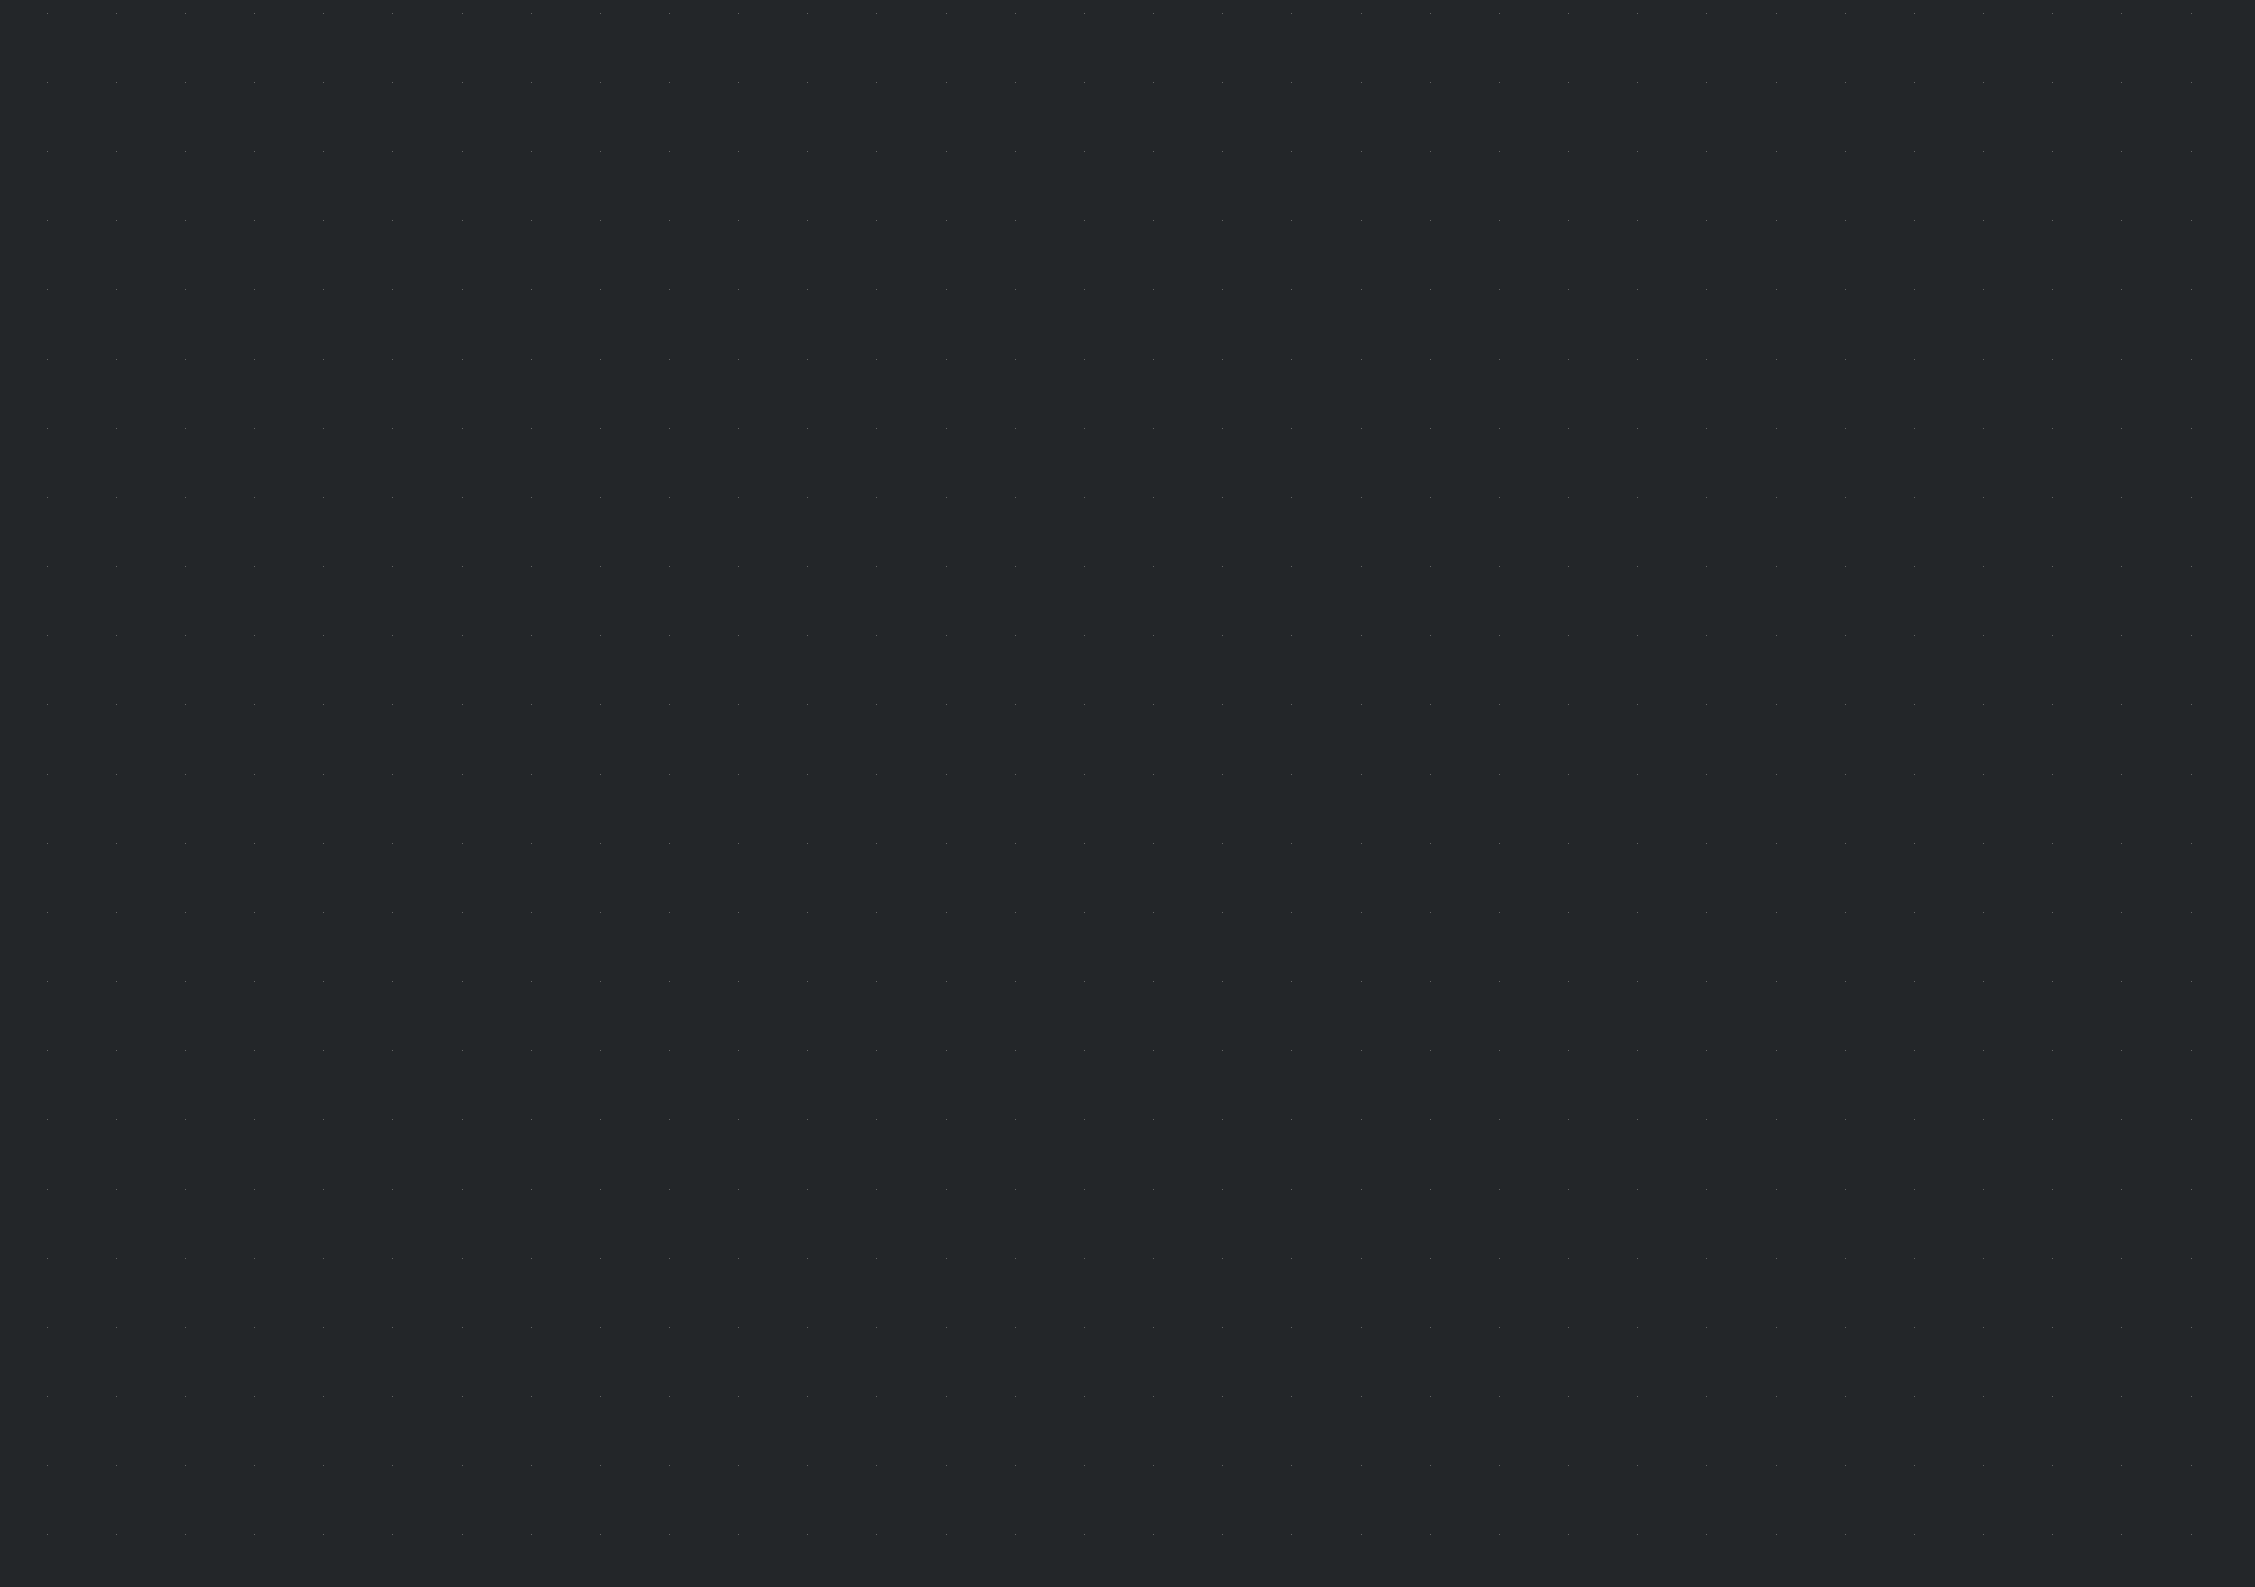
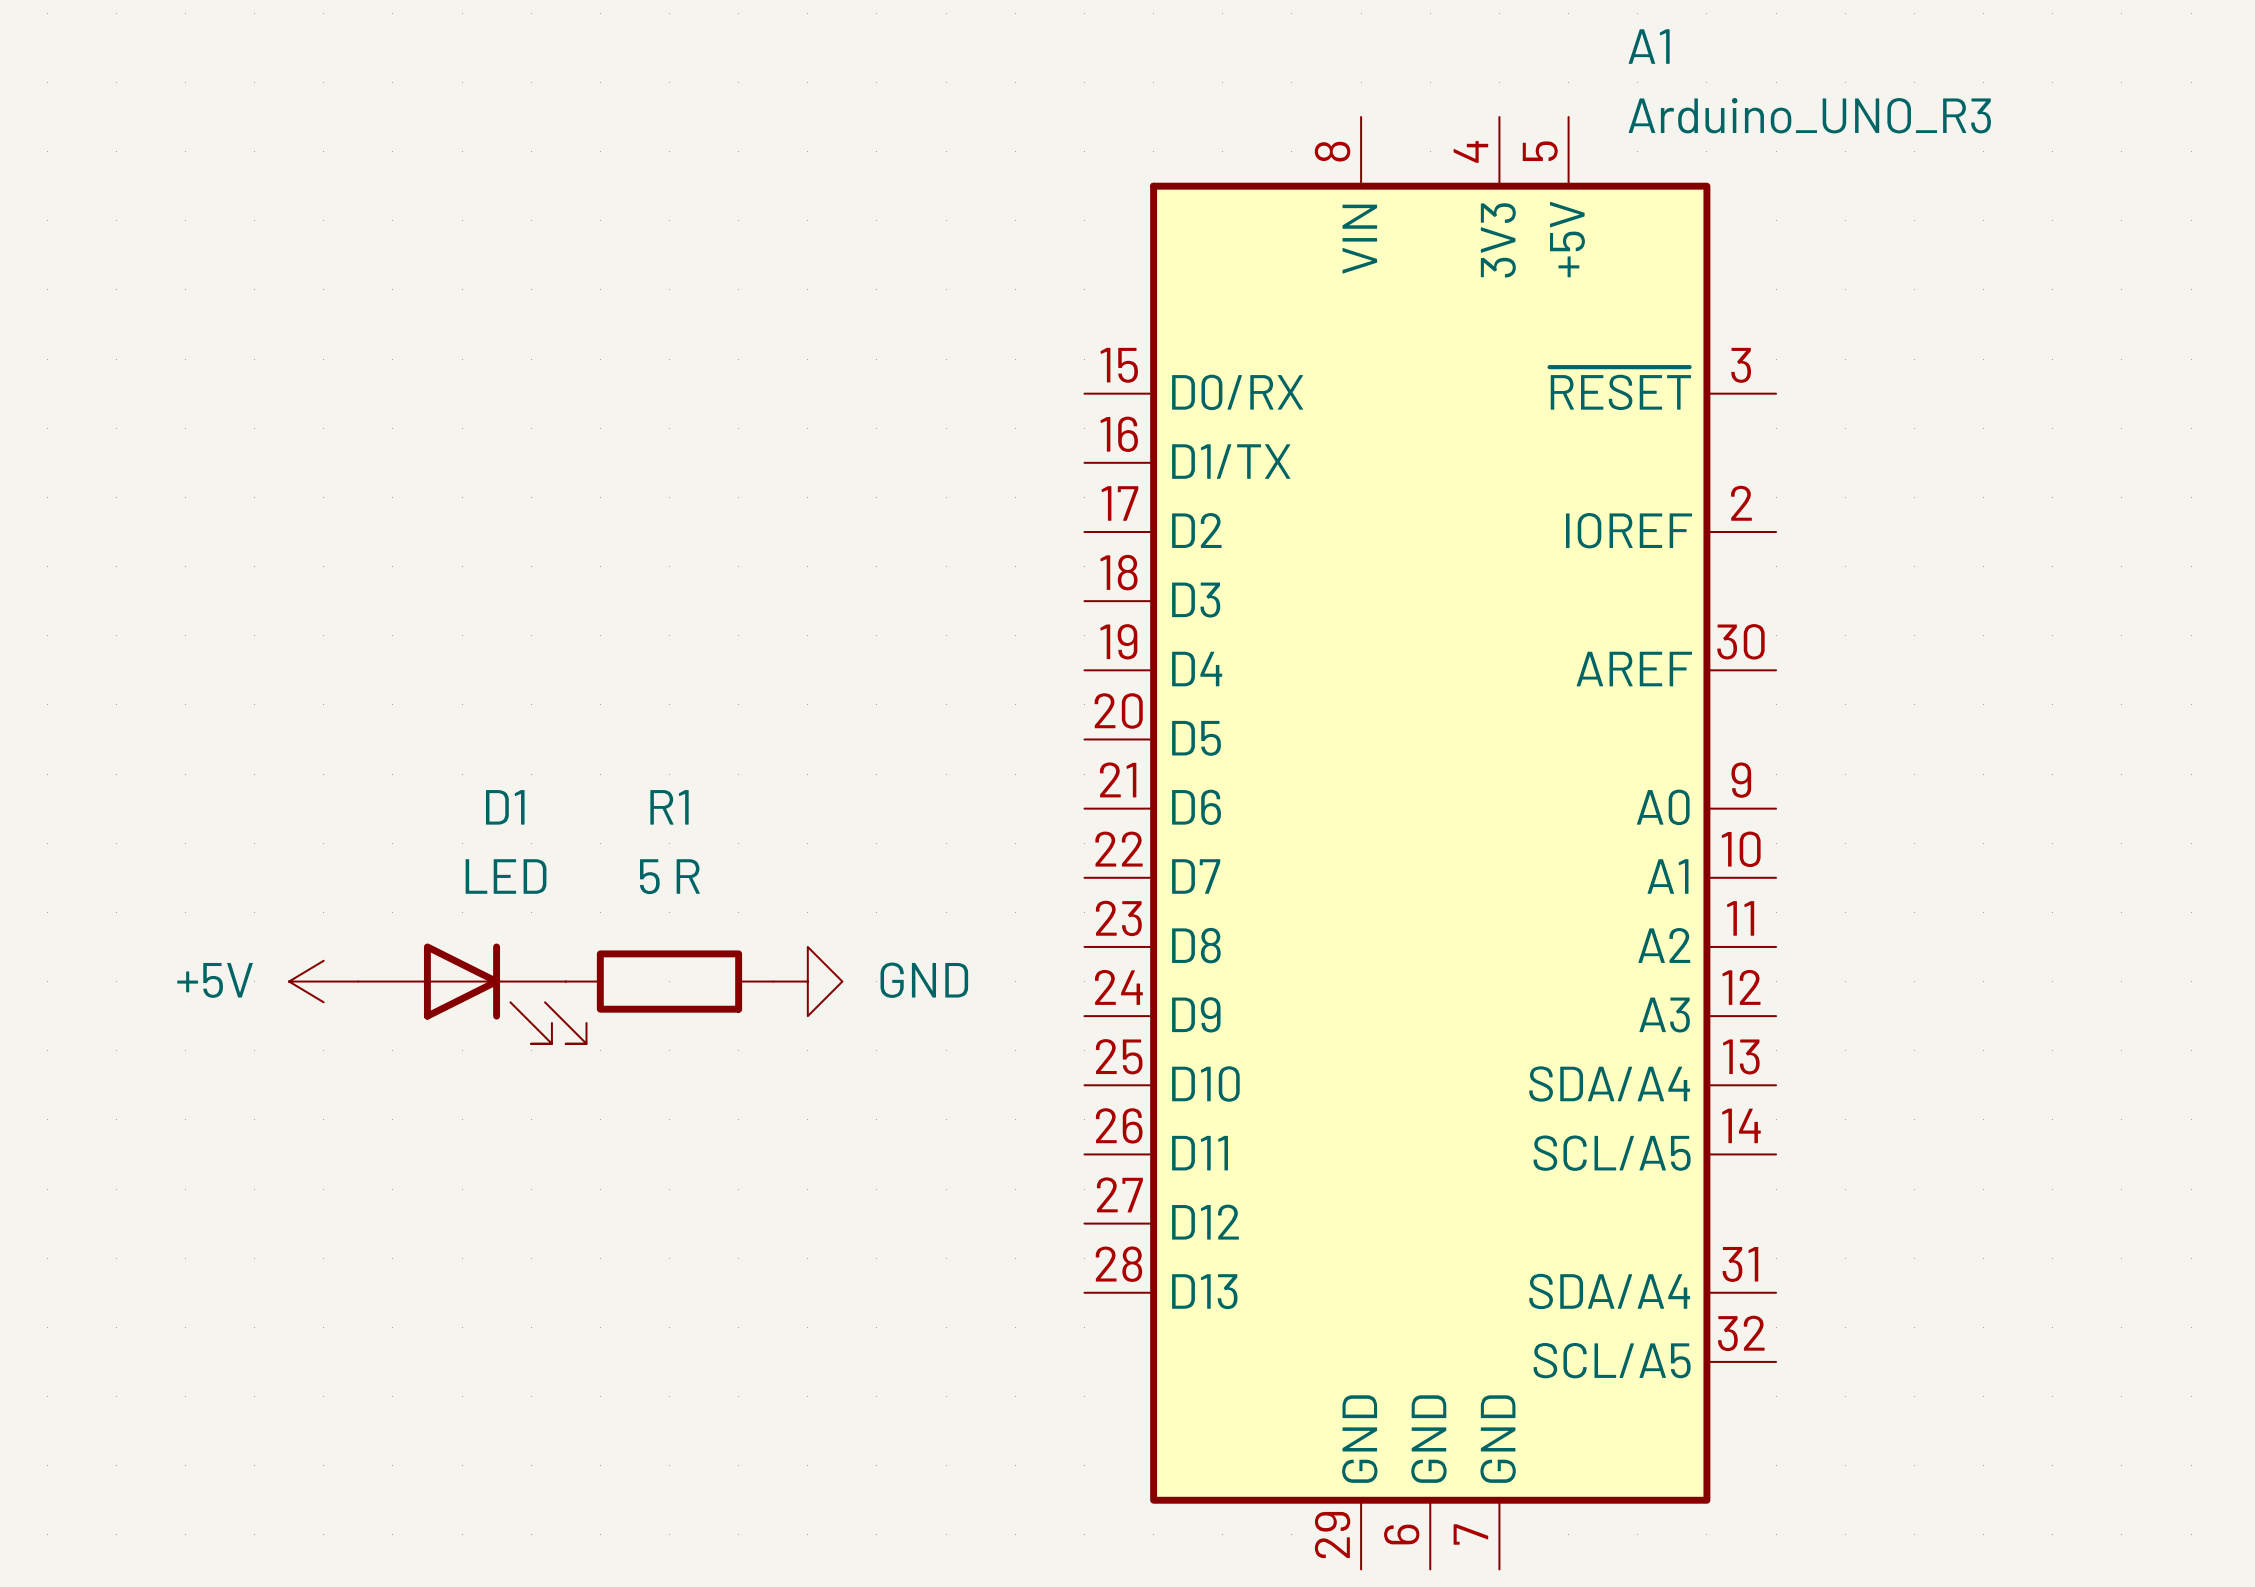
A1: none -> Arduino_UNO_R3 (1430, 843)
power symbol: none -> +5V (323, 981)
R1: none -> 5 R (669, 981)
power symbol: none -> GND (807, 981)
D1: none -> LED (472, 993)

